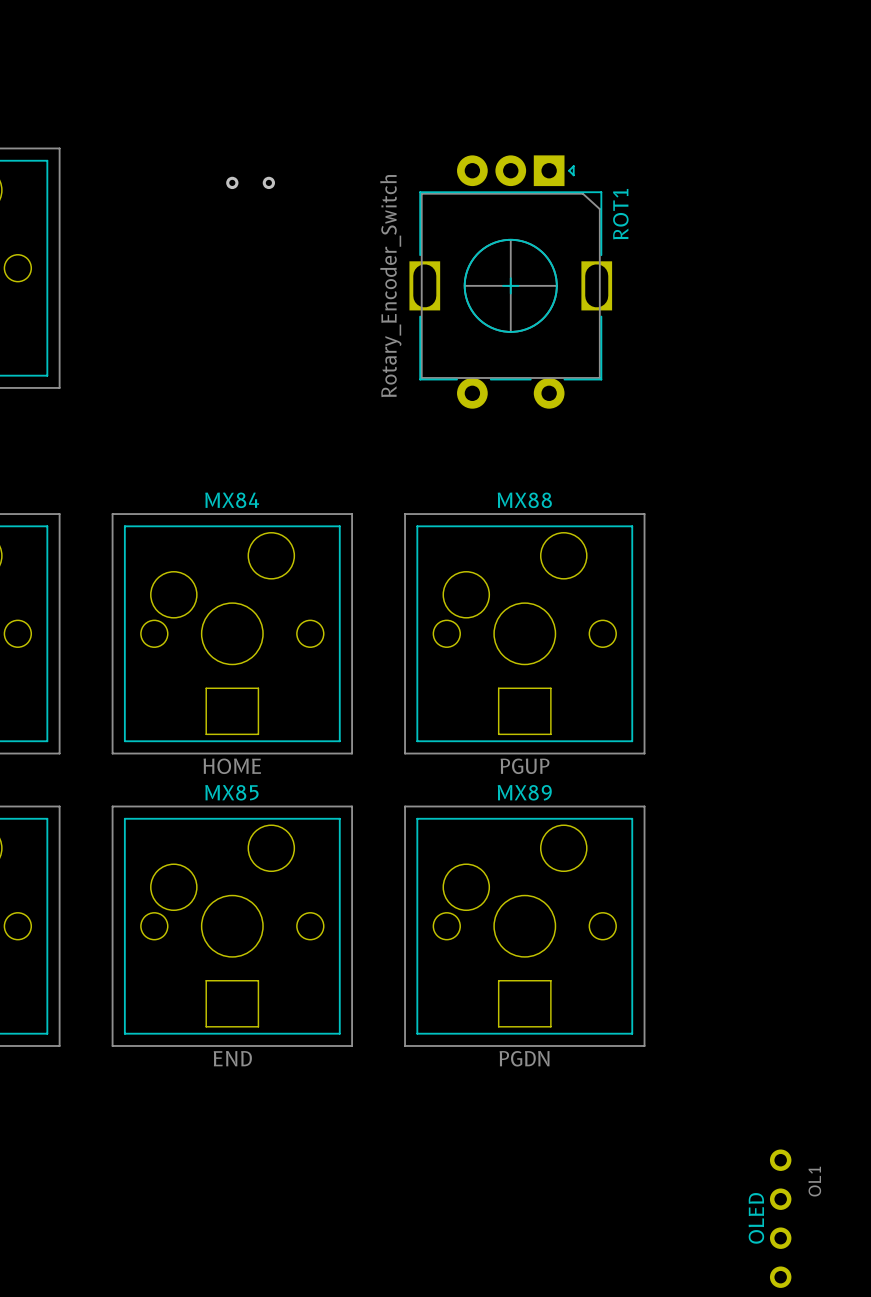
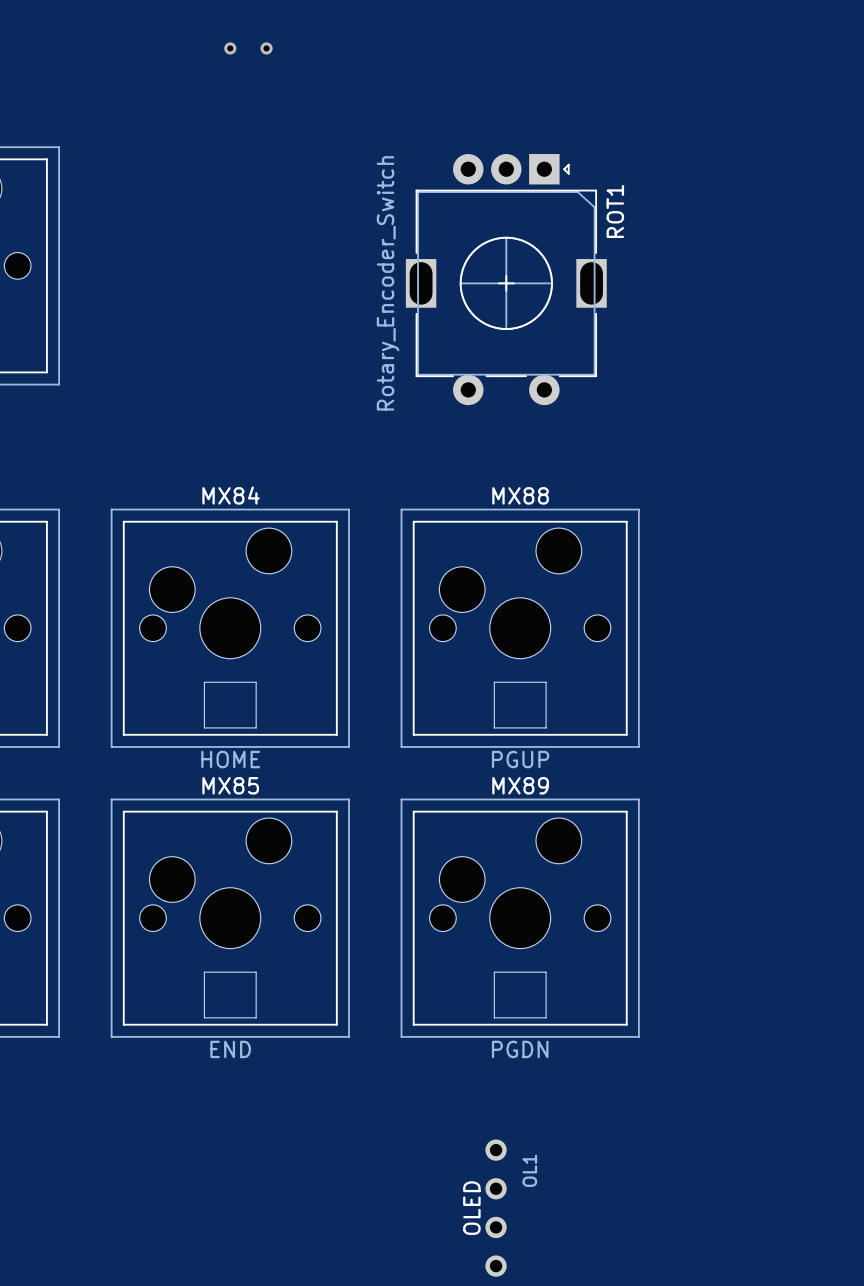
via: none -> (230, 48)
via: none -> (266, 48)
via: (232, 182) -> none
via: (268, 182) -> none
OL1 position: (780, 1218) -> (496, 1208)

